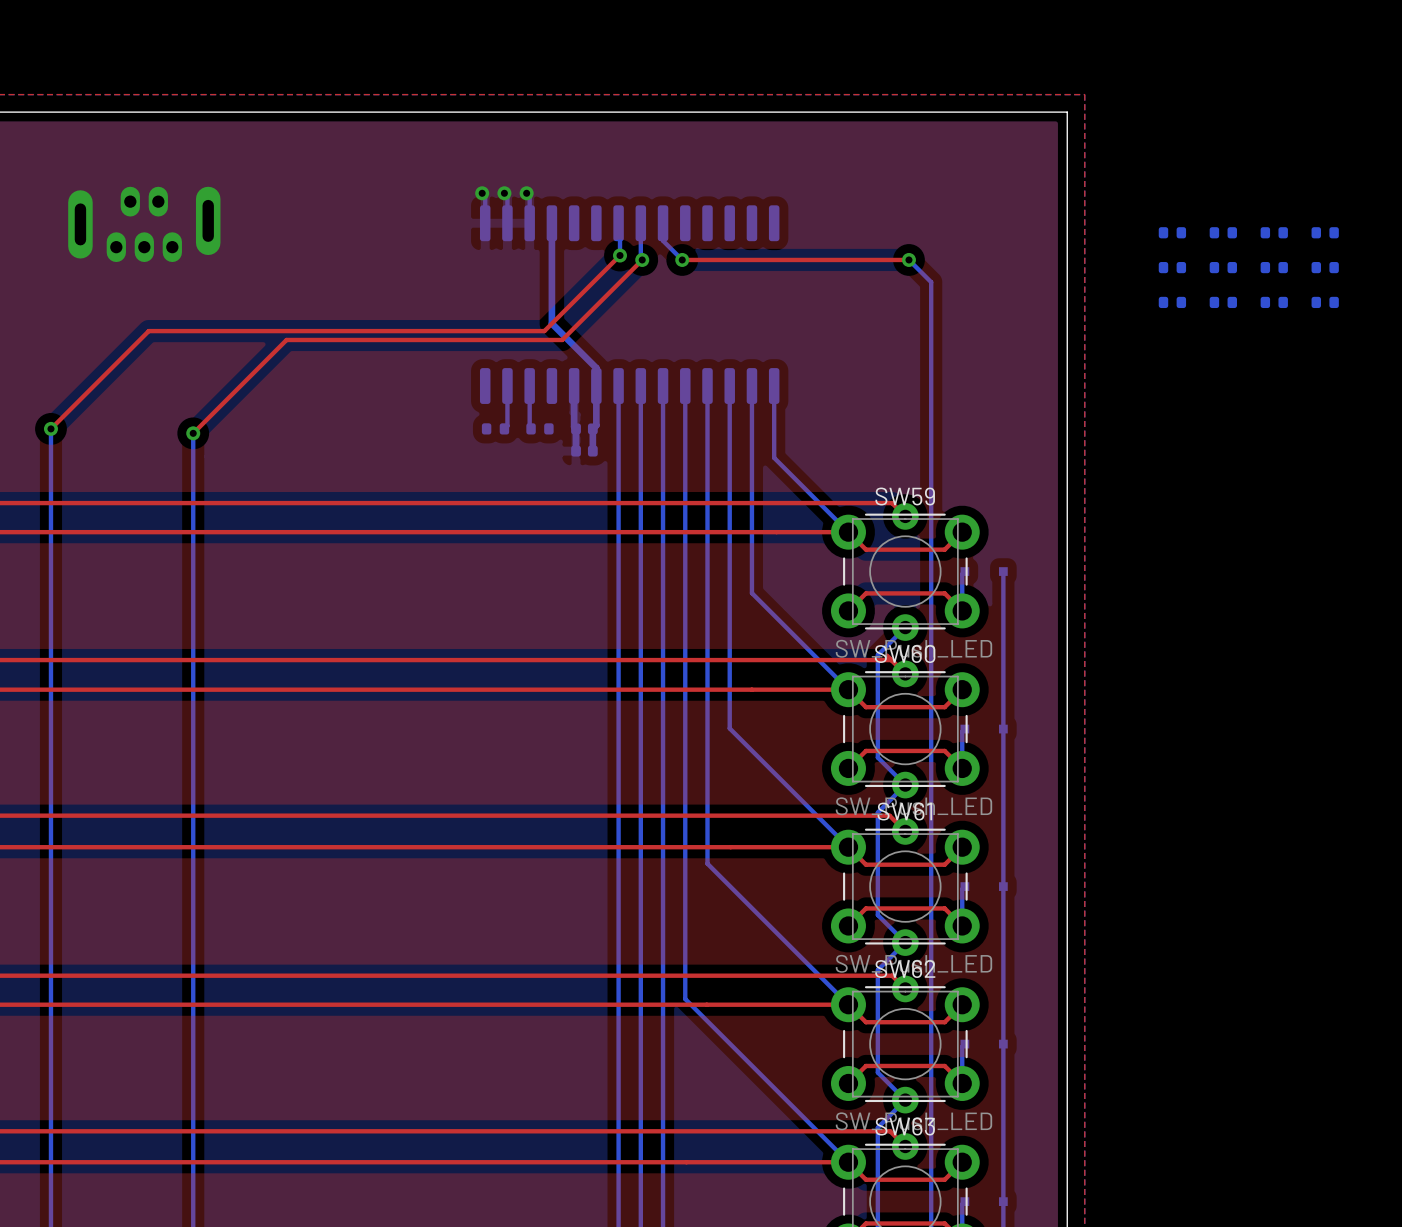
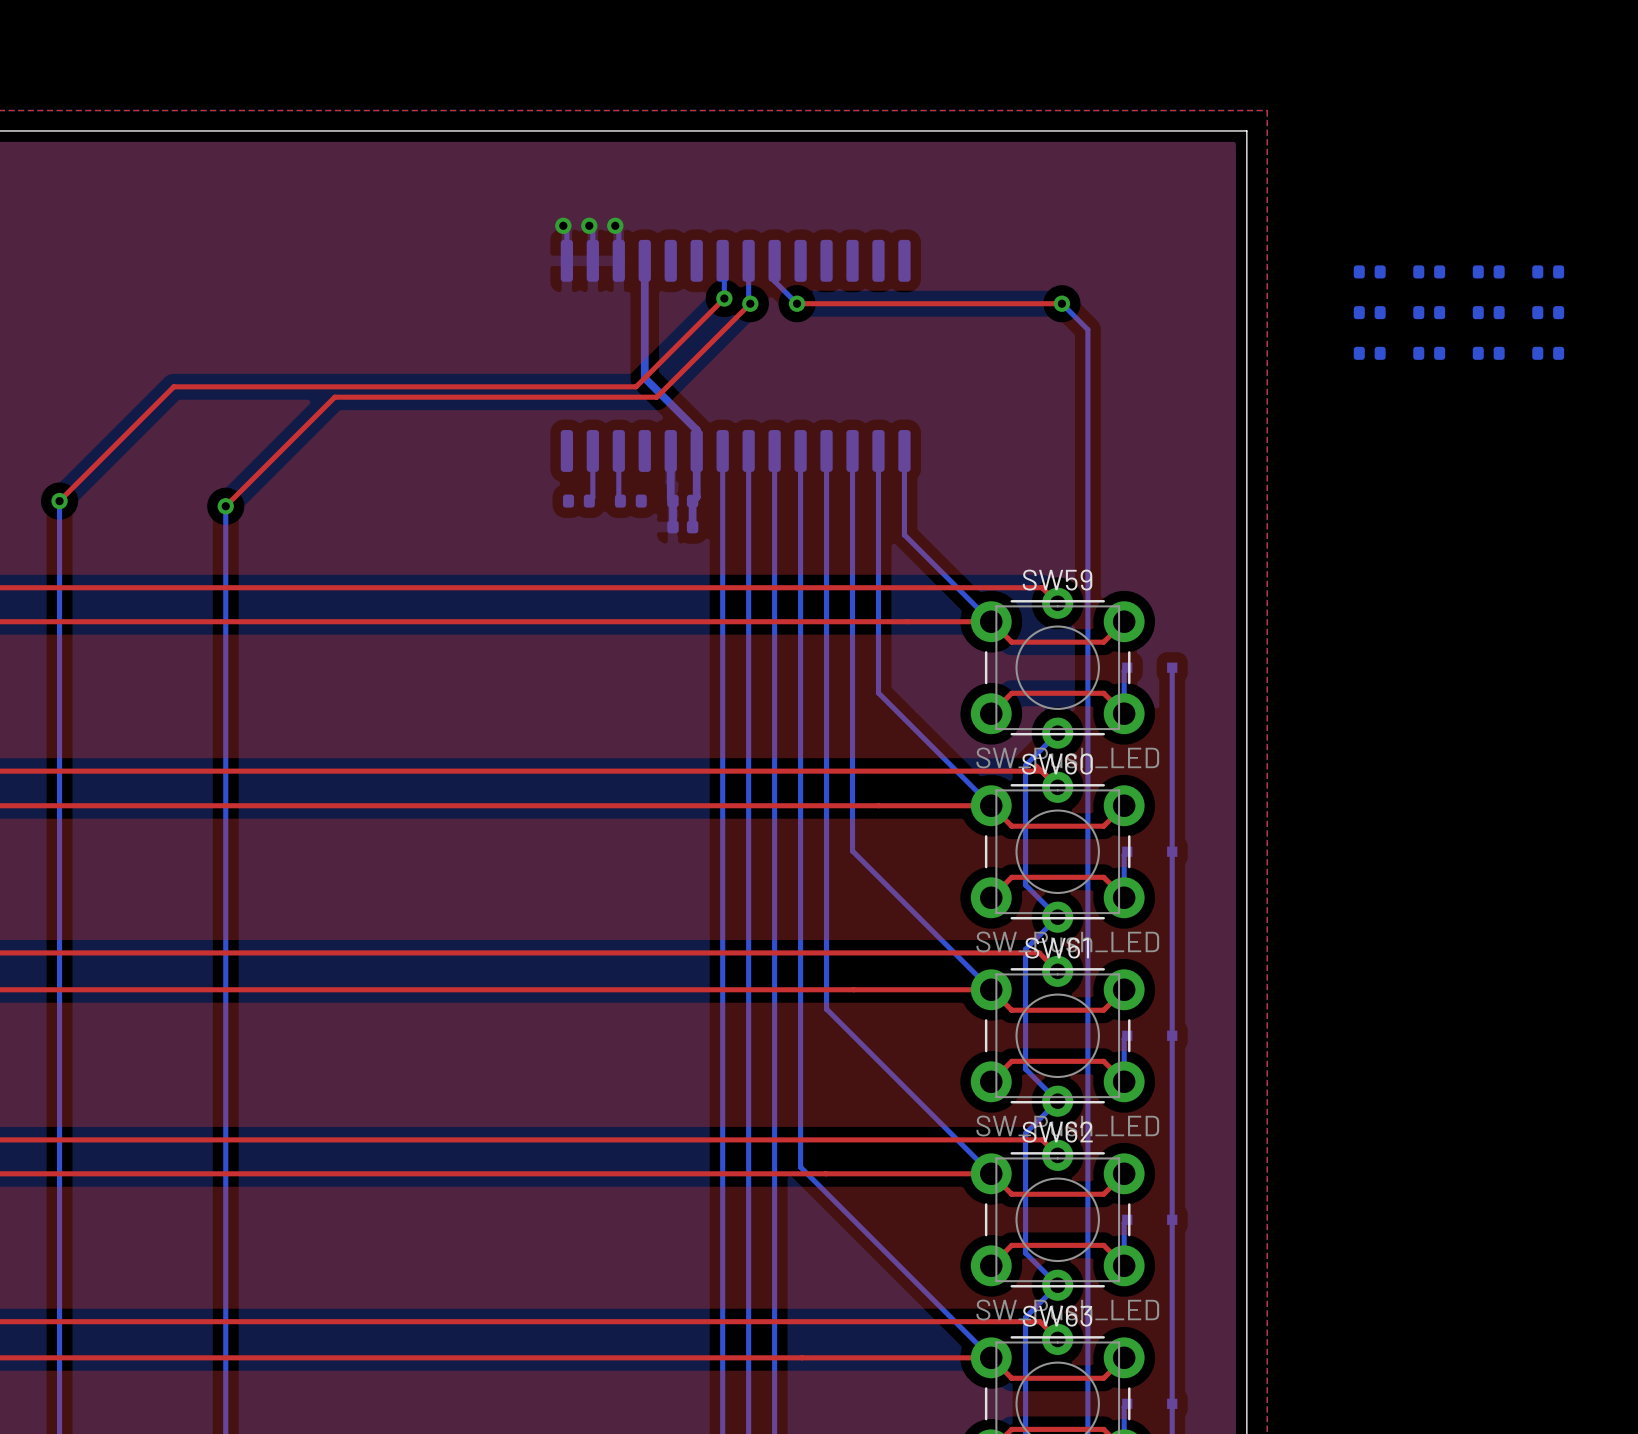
part: (144, 224) -> none

